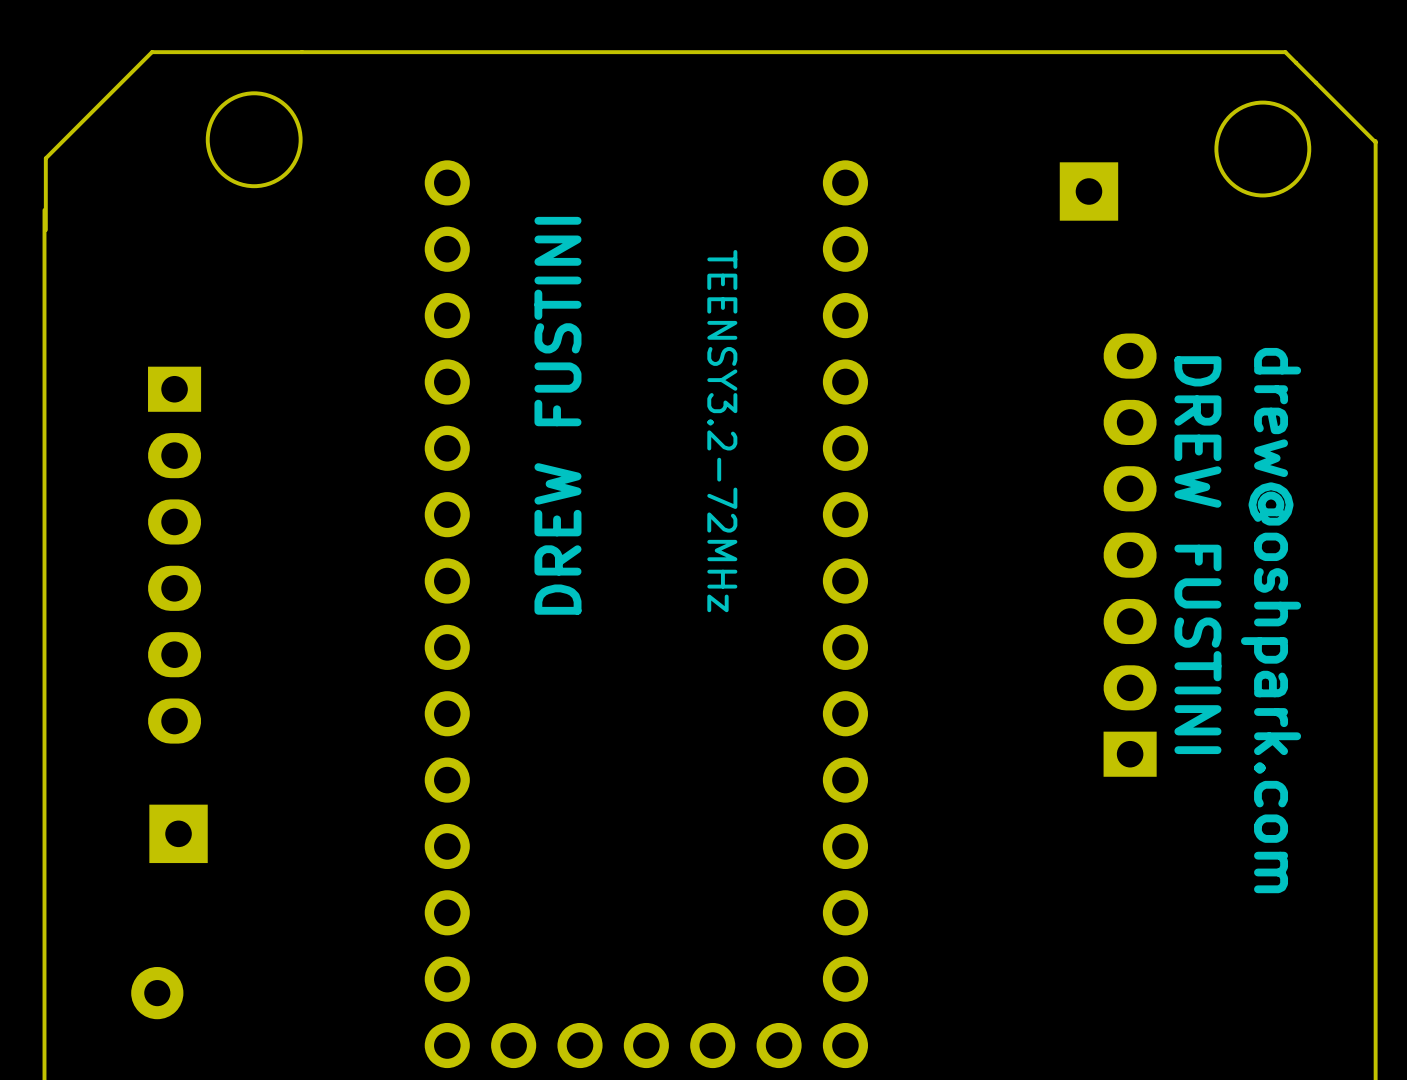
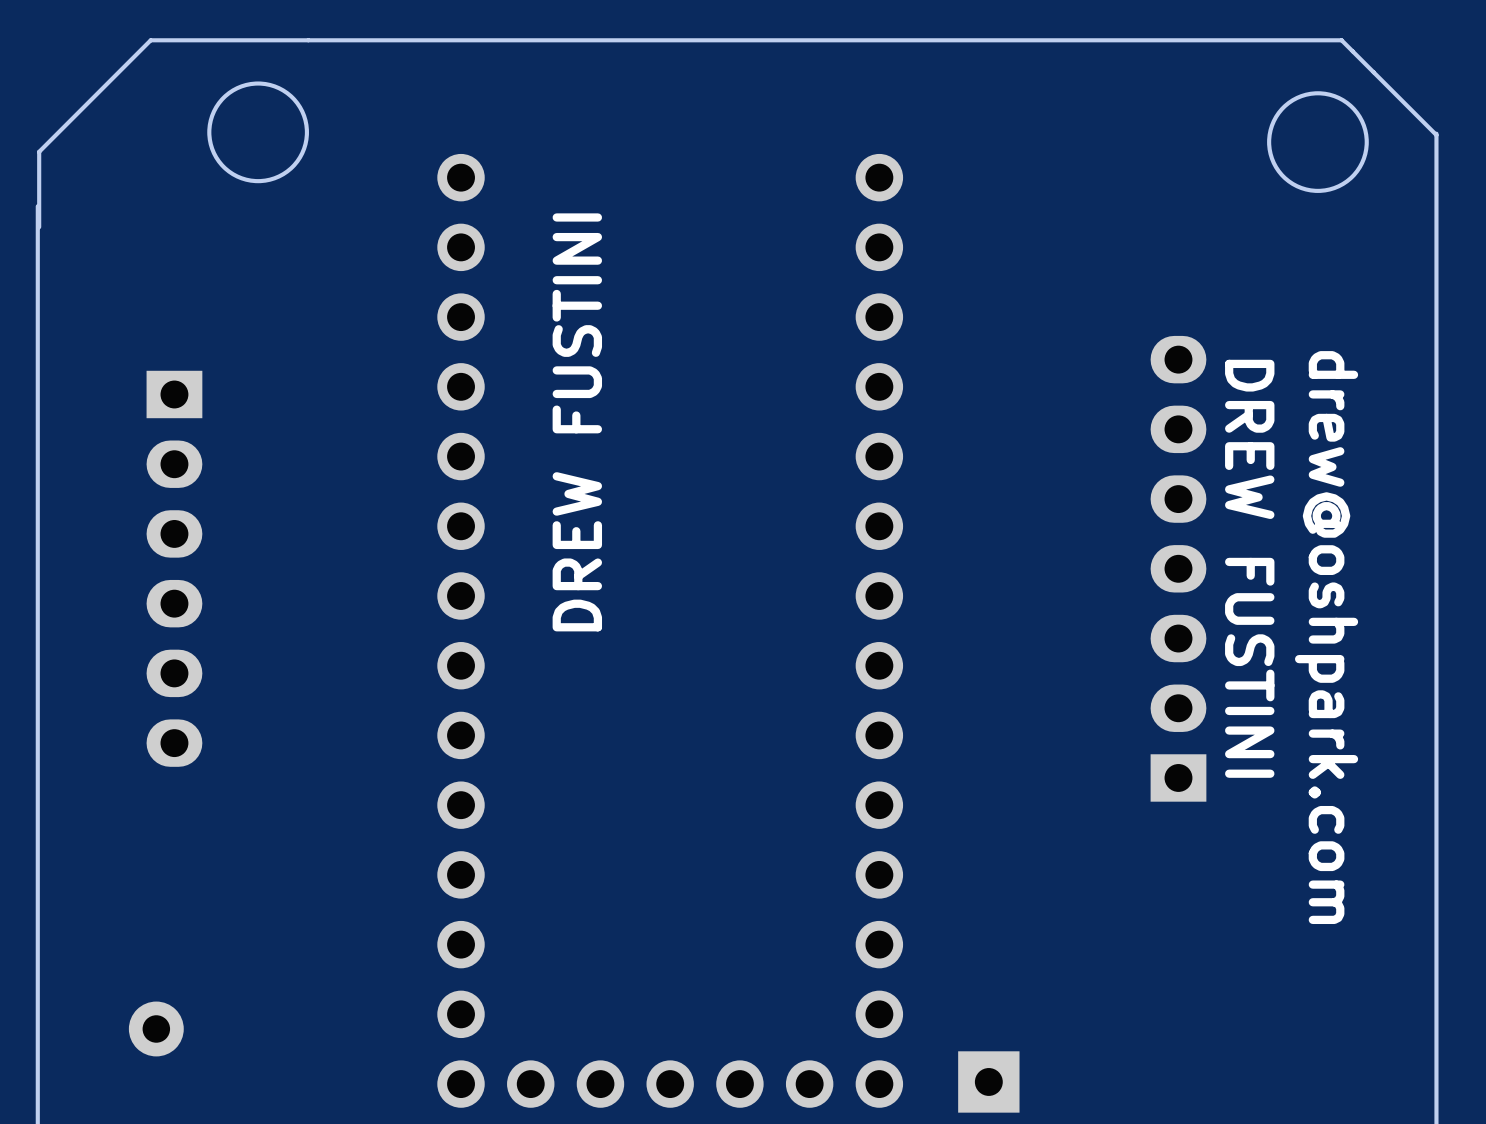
part: (1088, 191) -> none
part value: TEENSY3.2-72MHz (722, 431) -> none
part: (178, 833) -> none
part: none -> (988, 1081)

